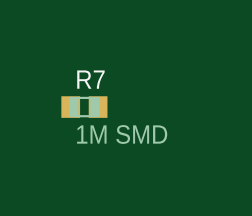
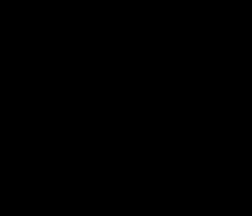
R7: 1M SMD (84, 107) -> none

